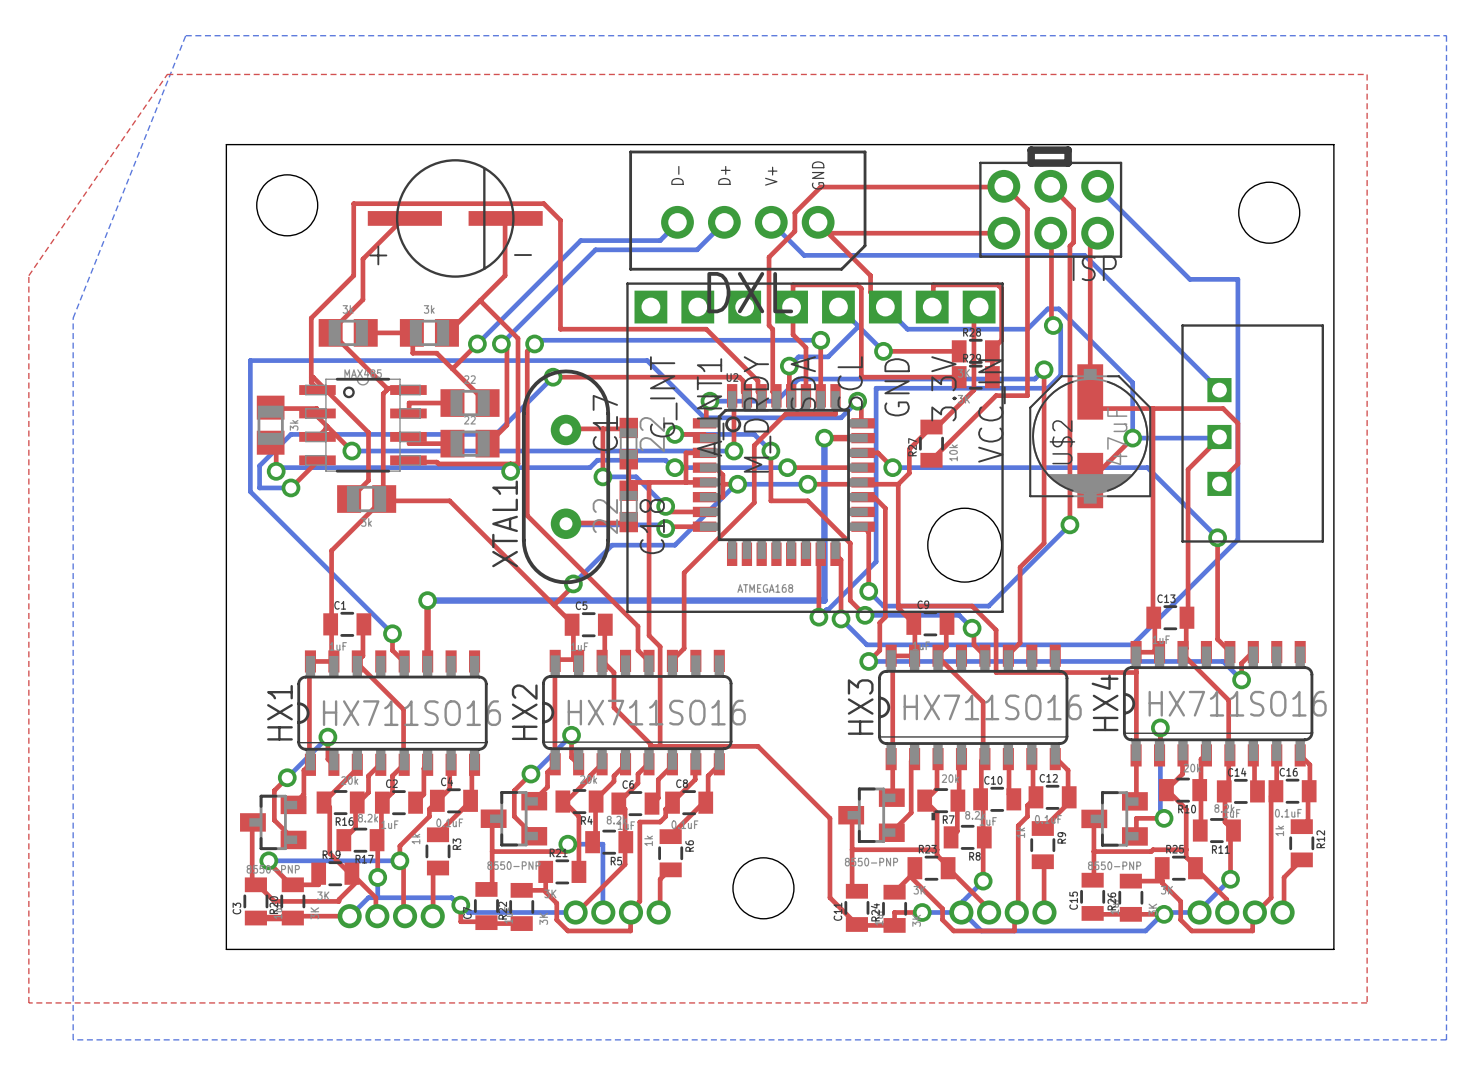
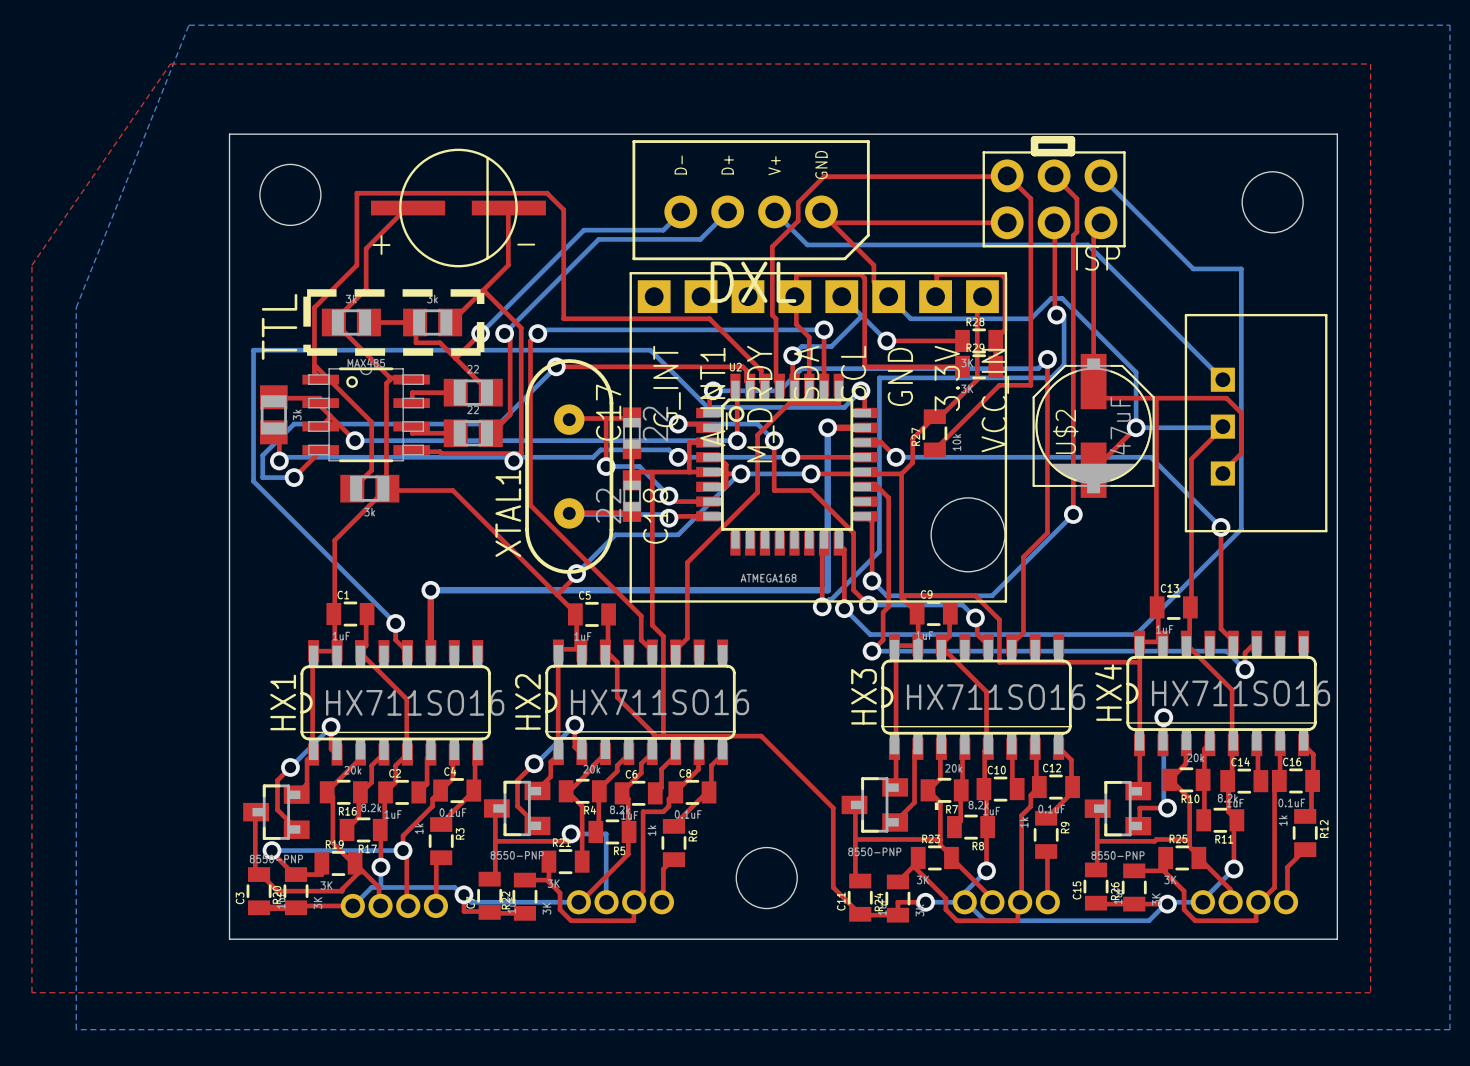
line: none -> (307, 292) (480, 292) (480, 352) (307, 352) (307, 296)
text: none -> TTL (279, 326)

